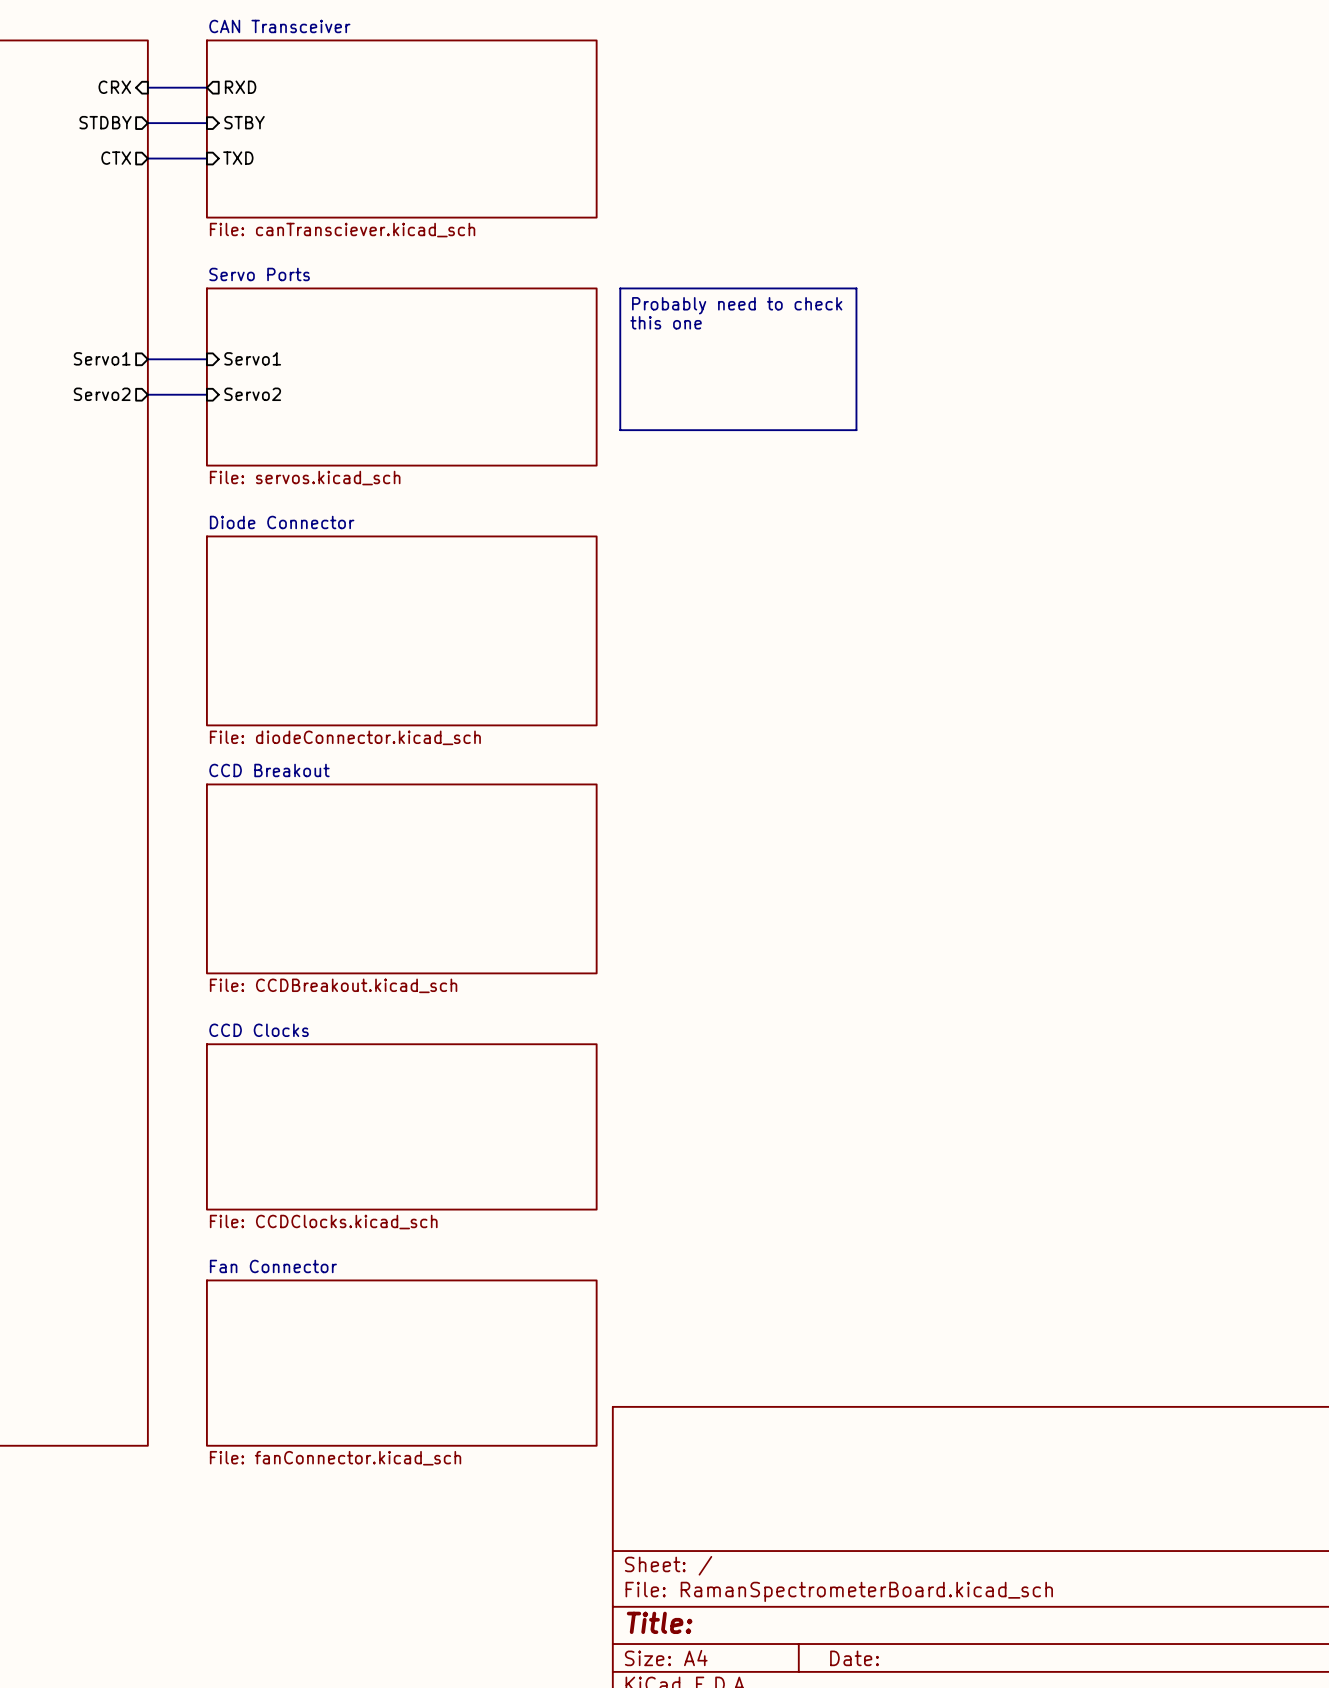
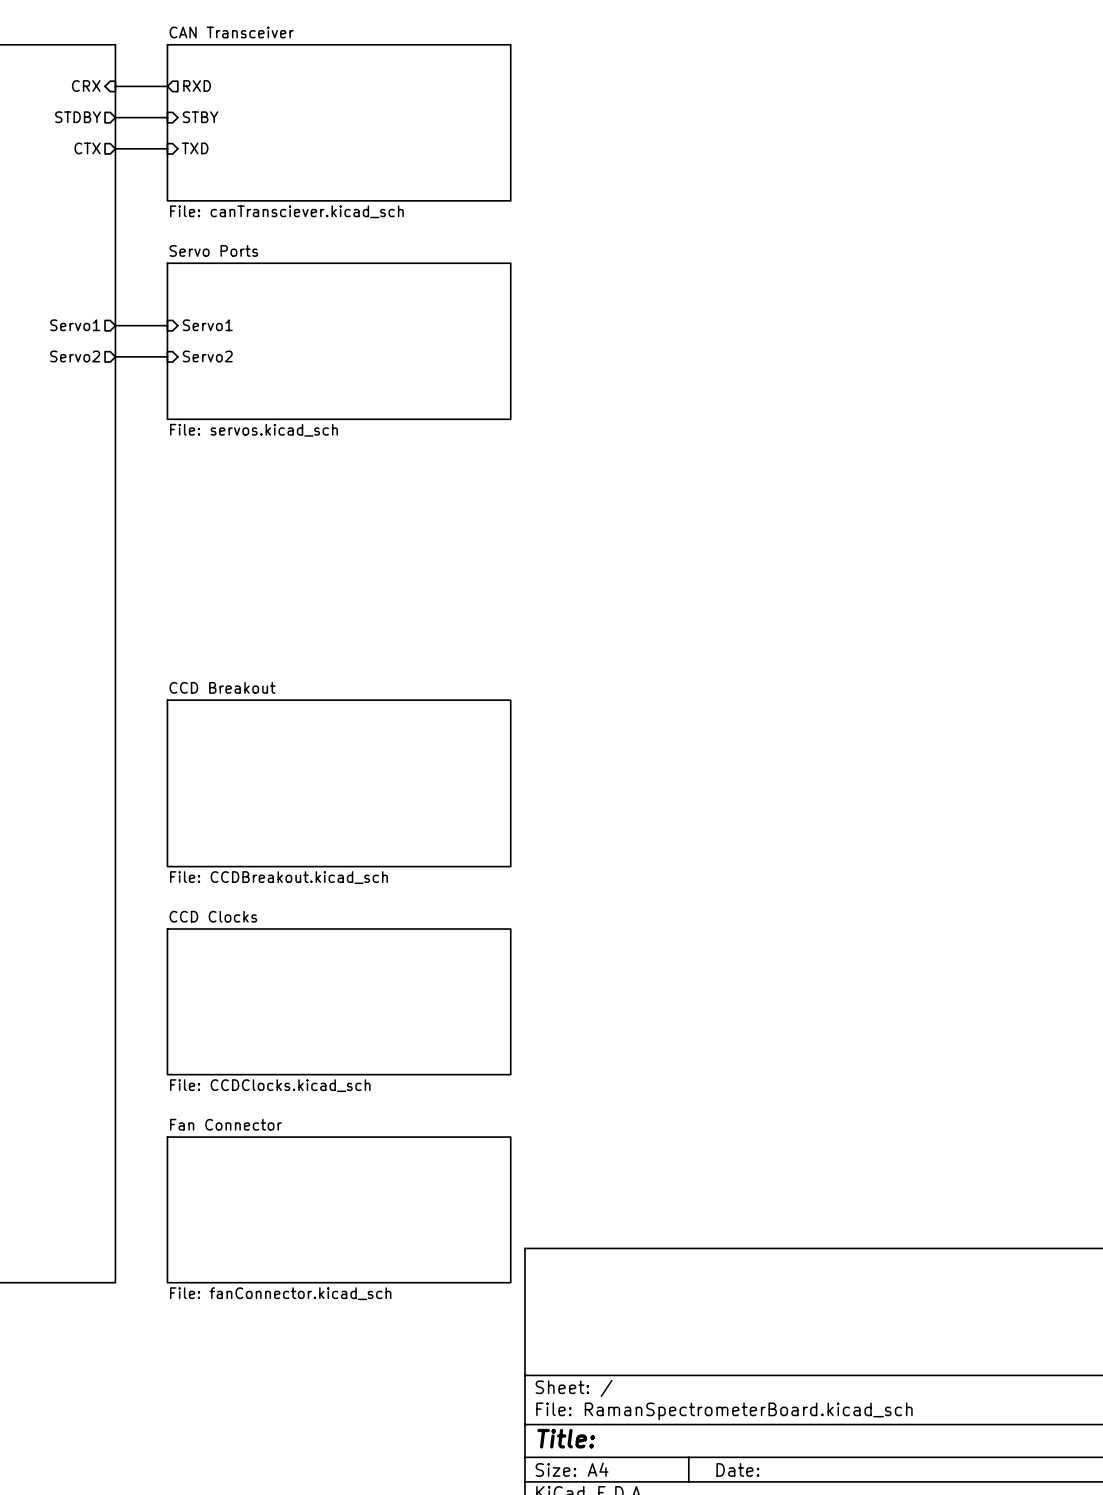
line: (620, 288) (856, 288) (856, 430) (620, 430) (620, 288) -> none
text: Probably need to check (737, 305) -> none
text: this one (666, 322) -> none
sheet Diode Connector: File: diodeConnector.kicad_sch (401, 630) -> none

